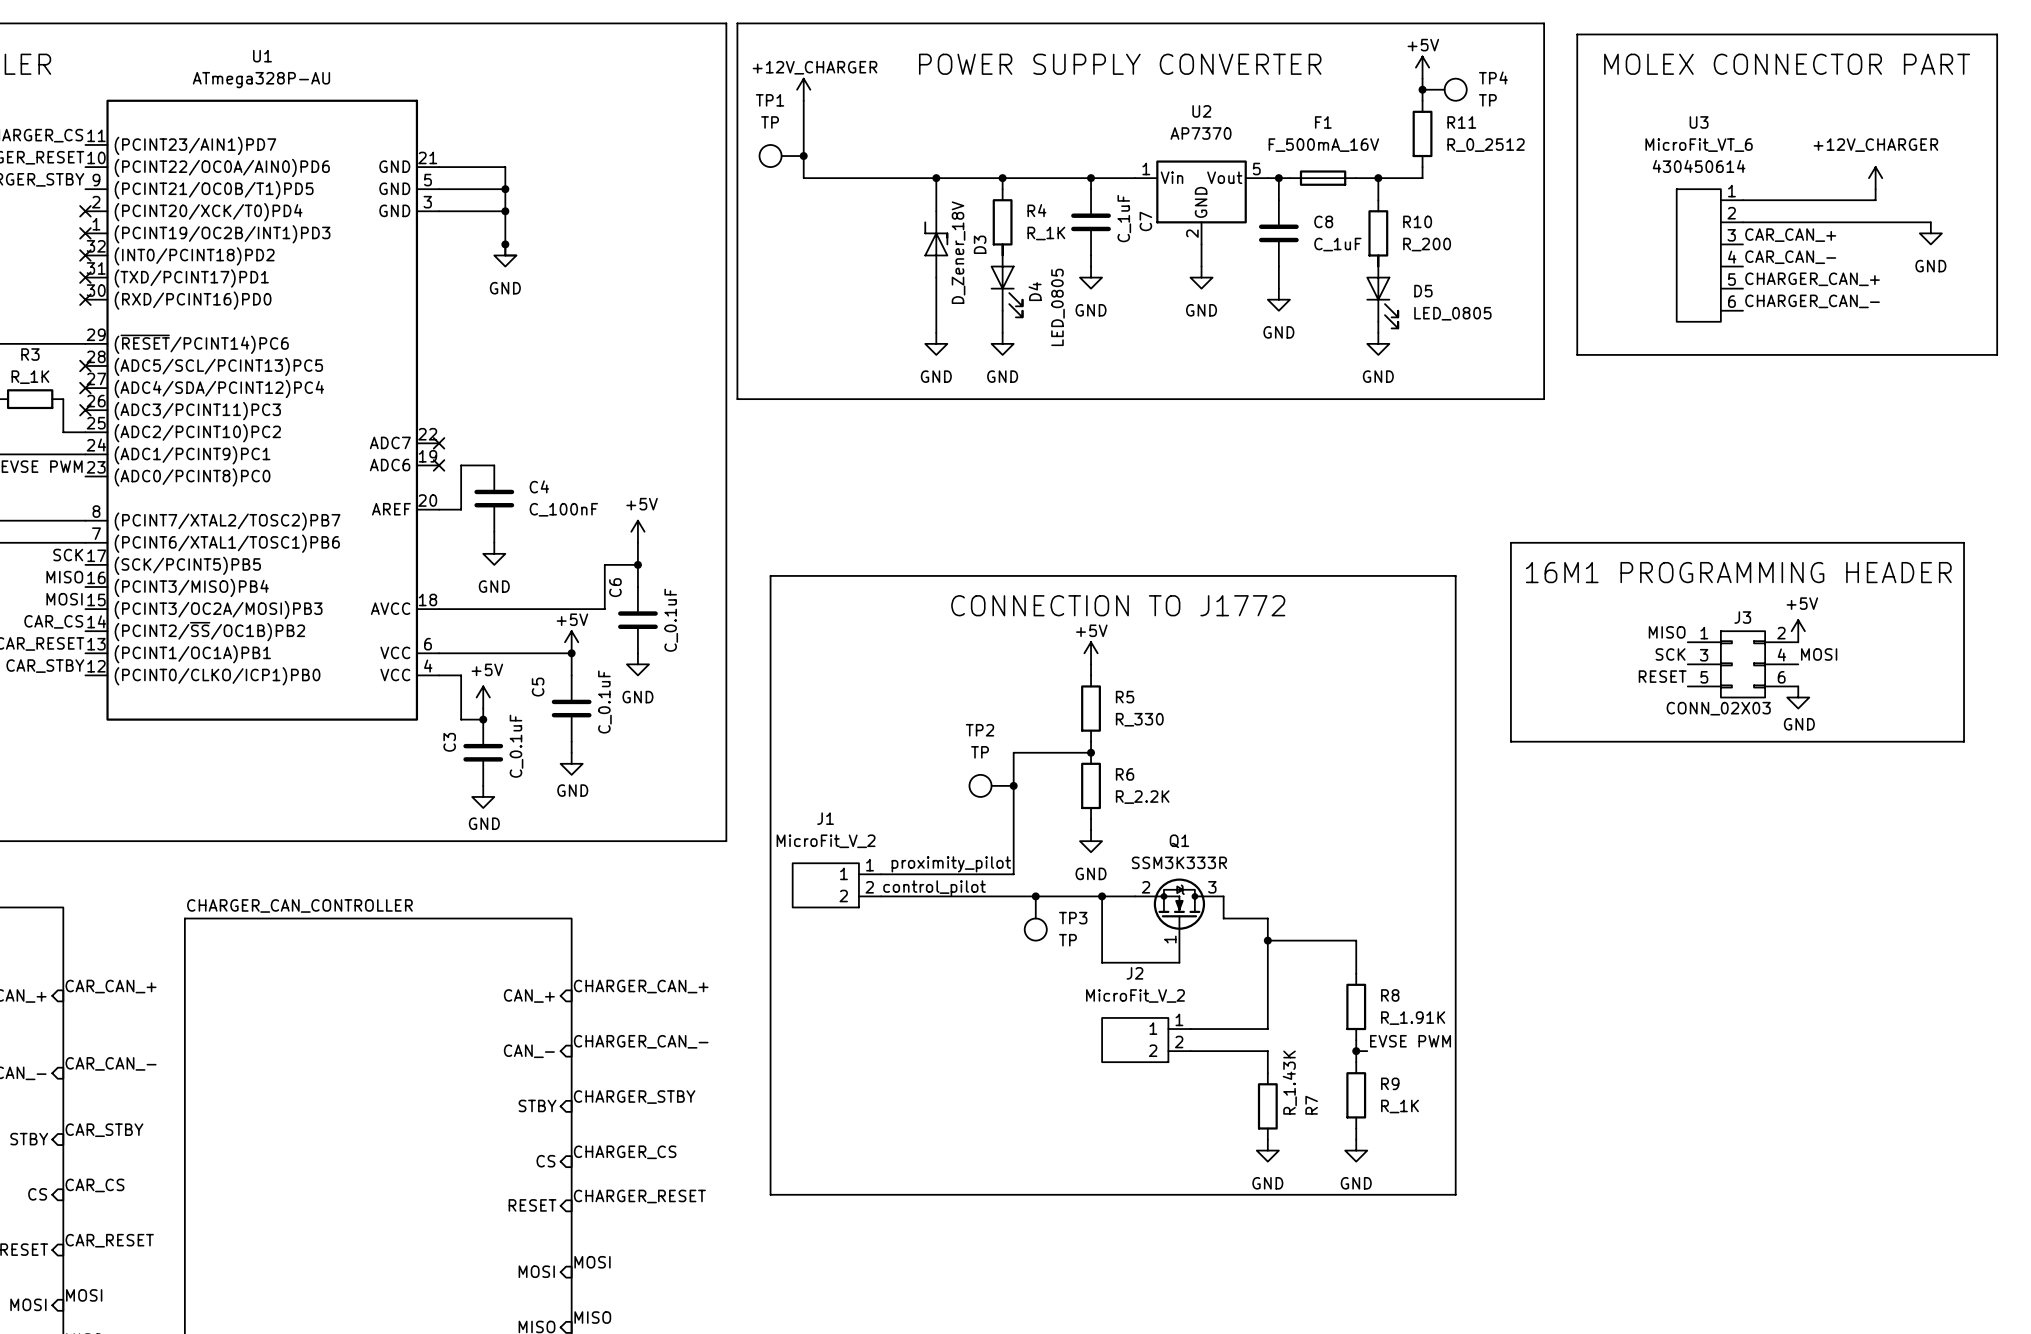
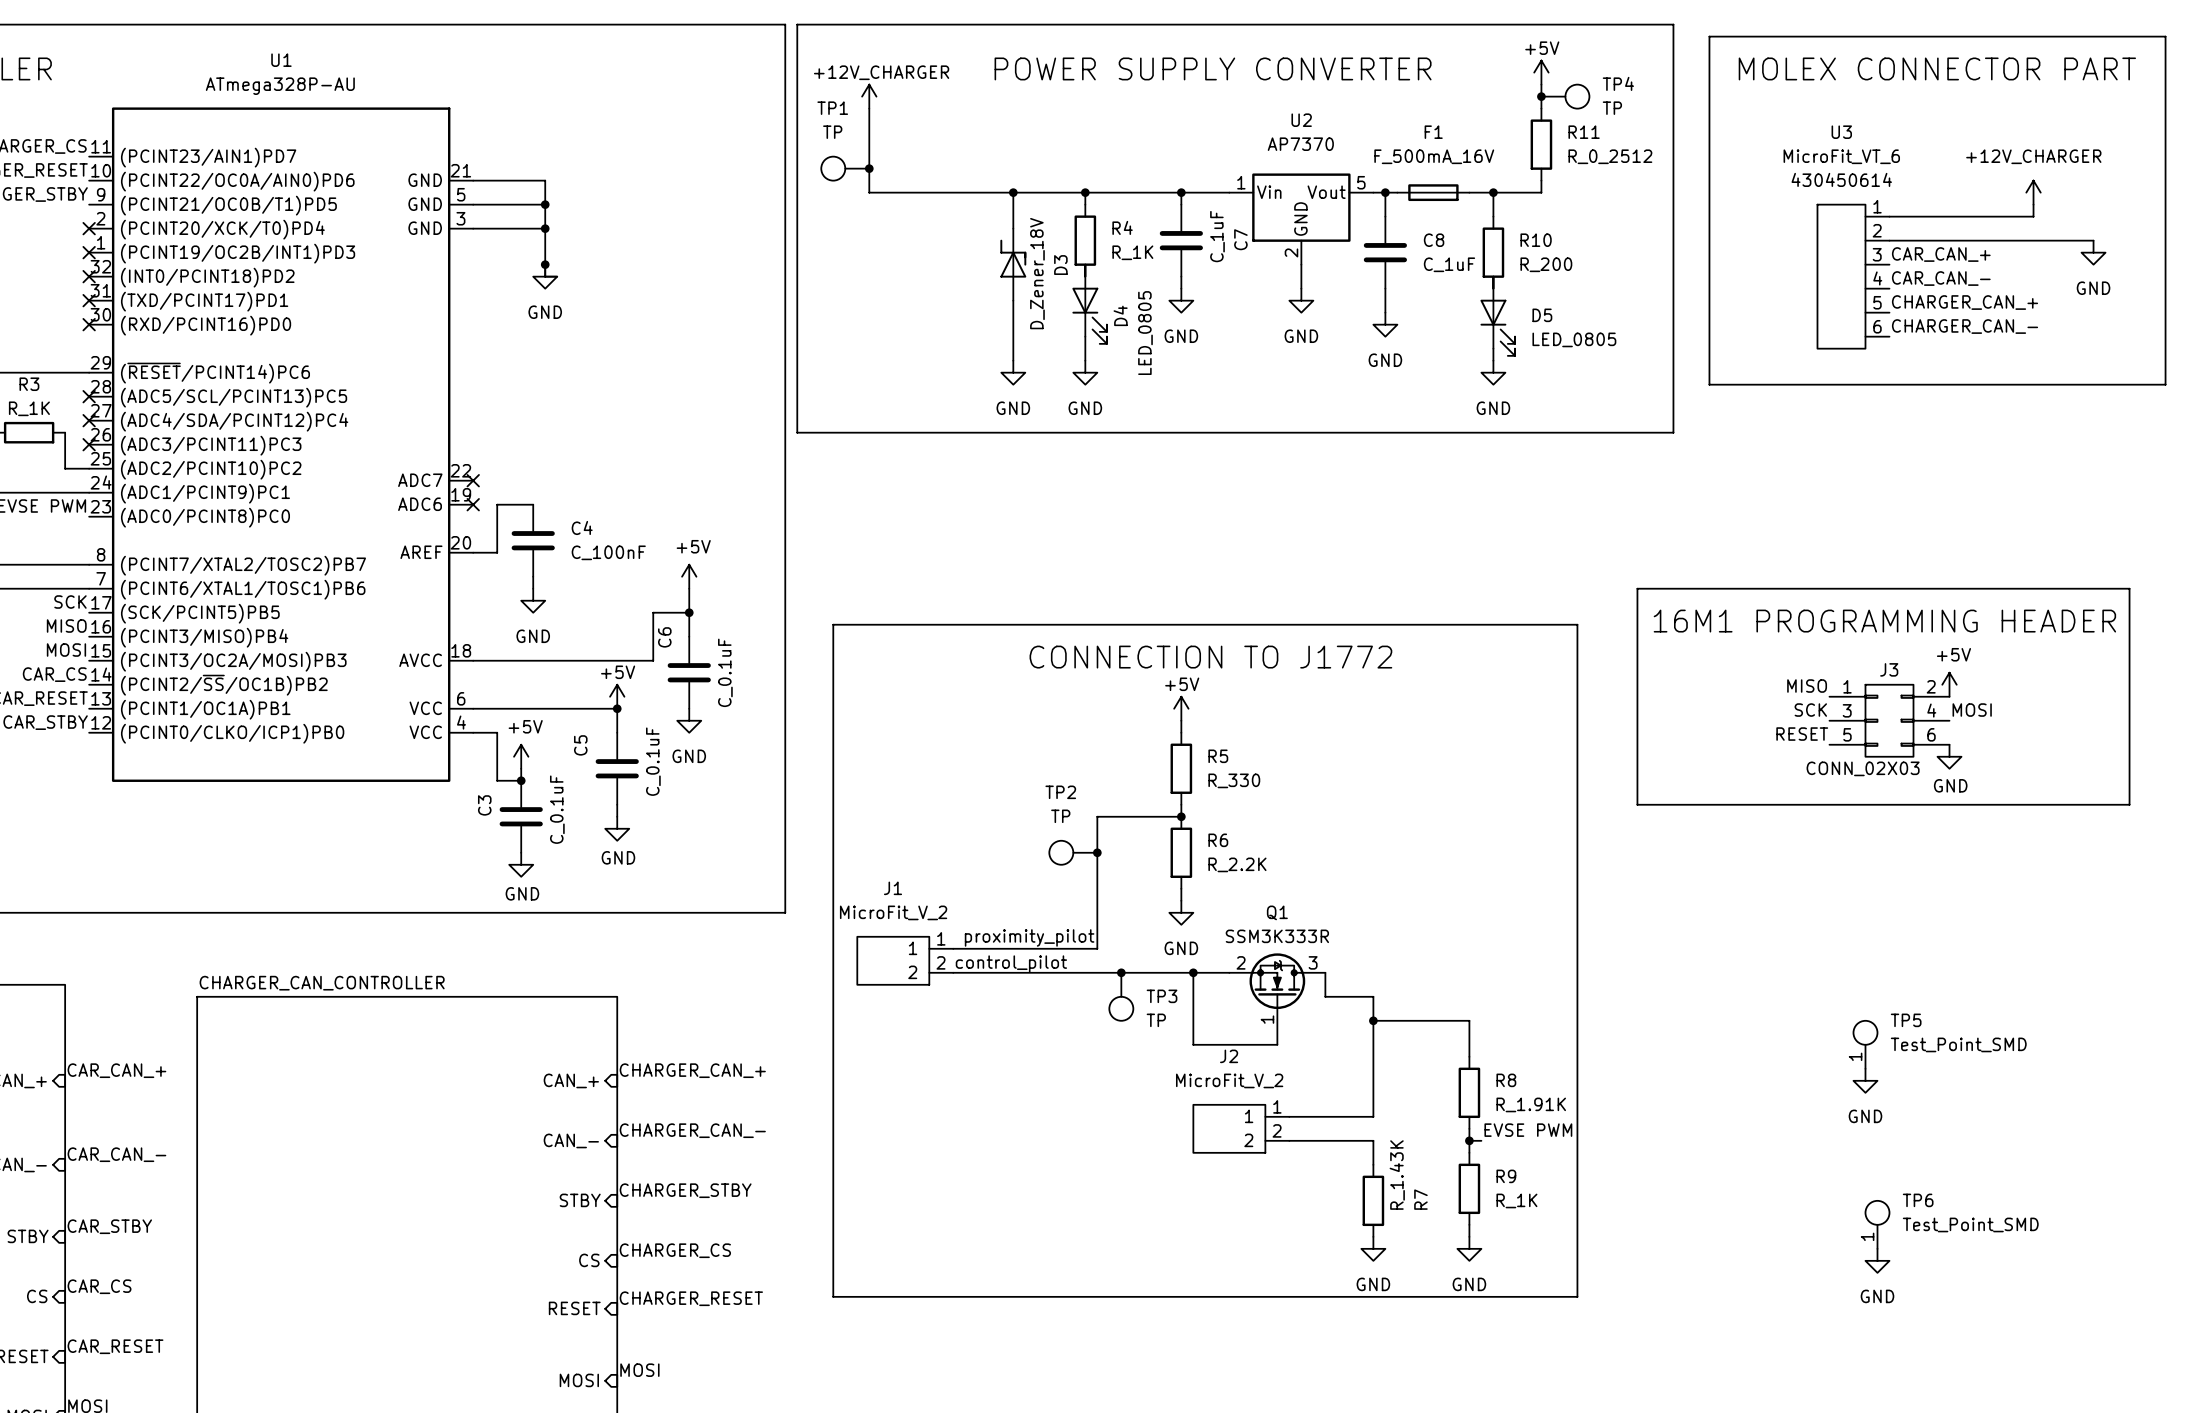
TP5: none -> Test_Point_SMD (1865, 1044)
power symbol: none -> GND (1865, 1080)
TP6: none -> Test_Point_SMD (1877, 1224)
power symbol: none -> GND (1877, 1260)

